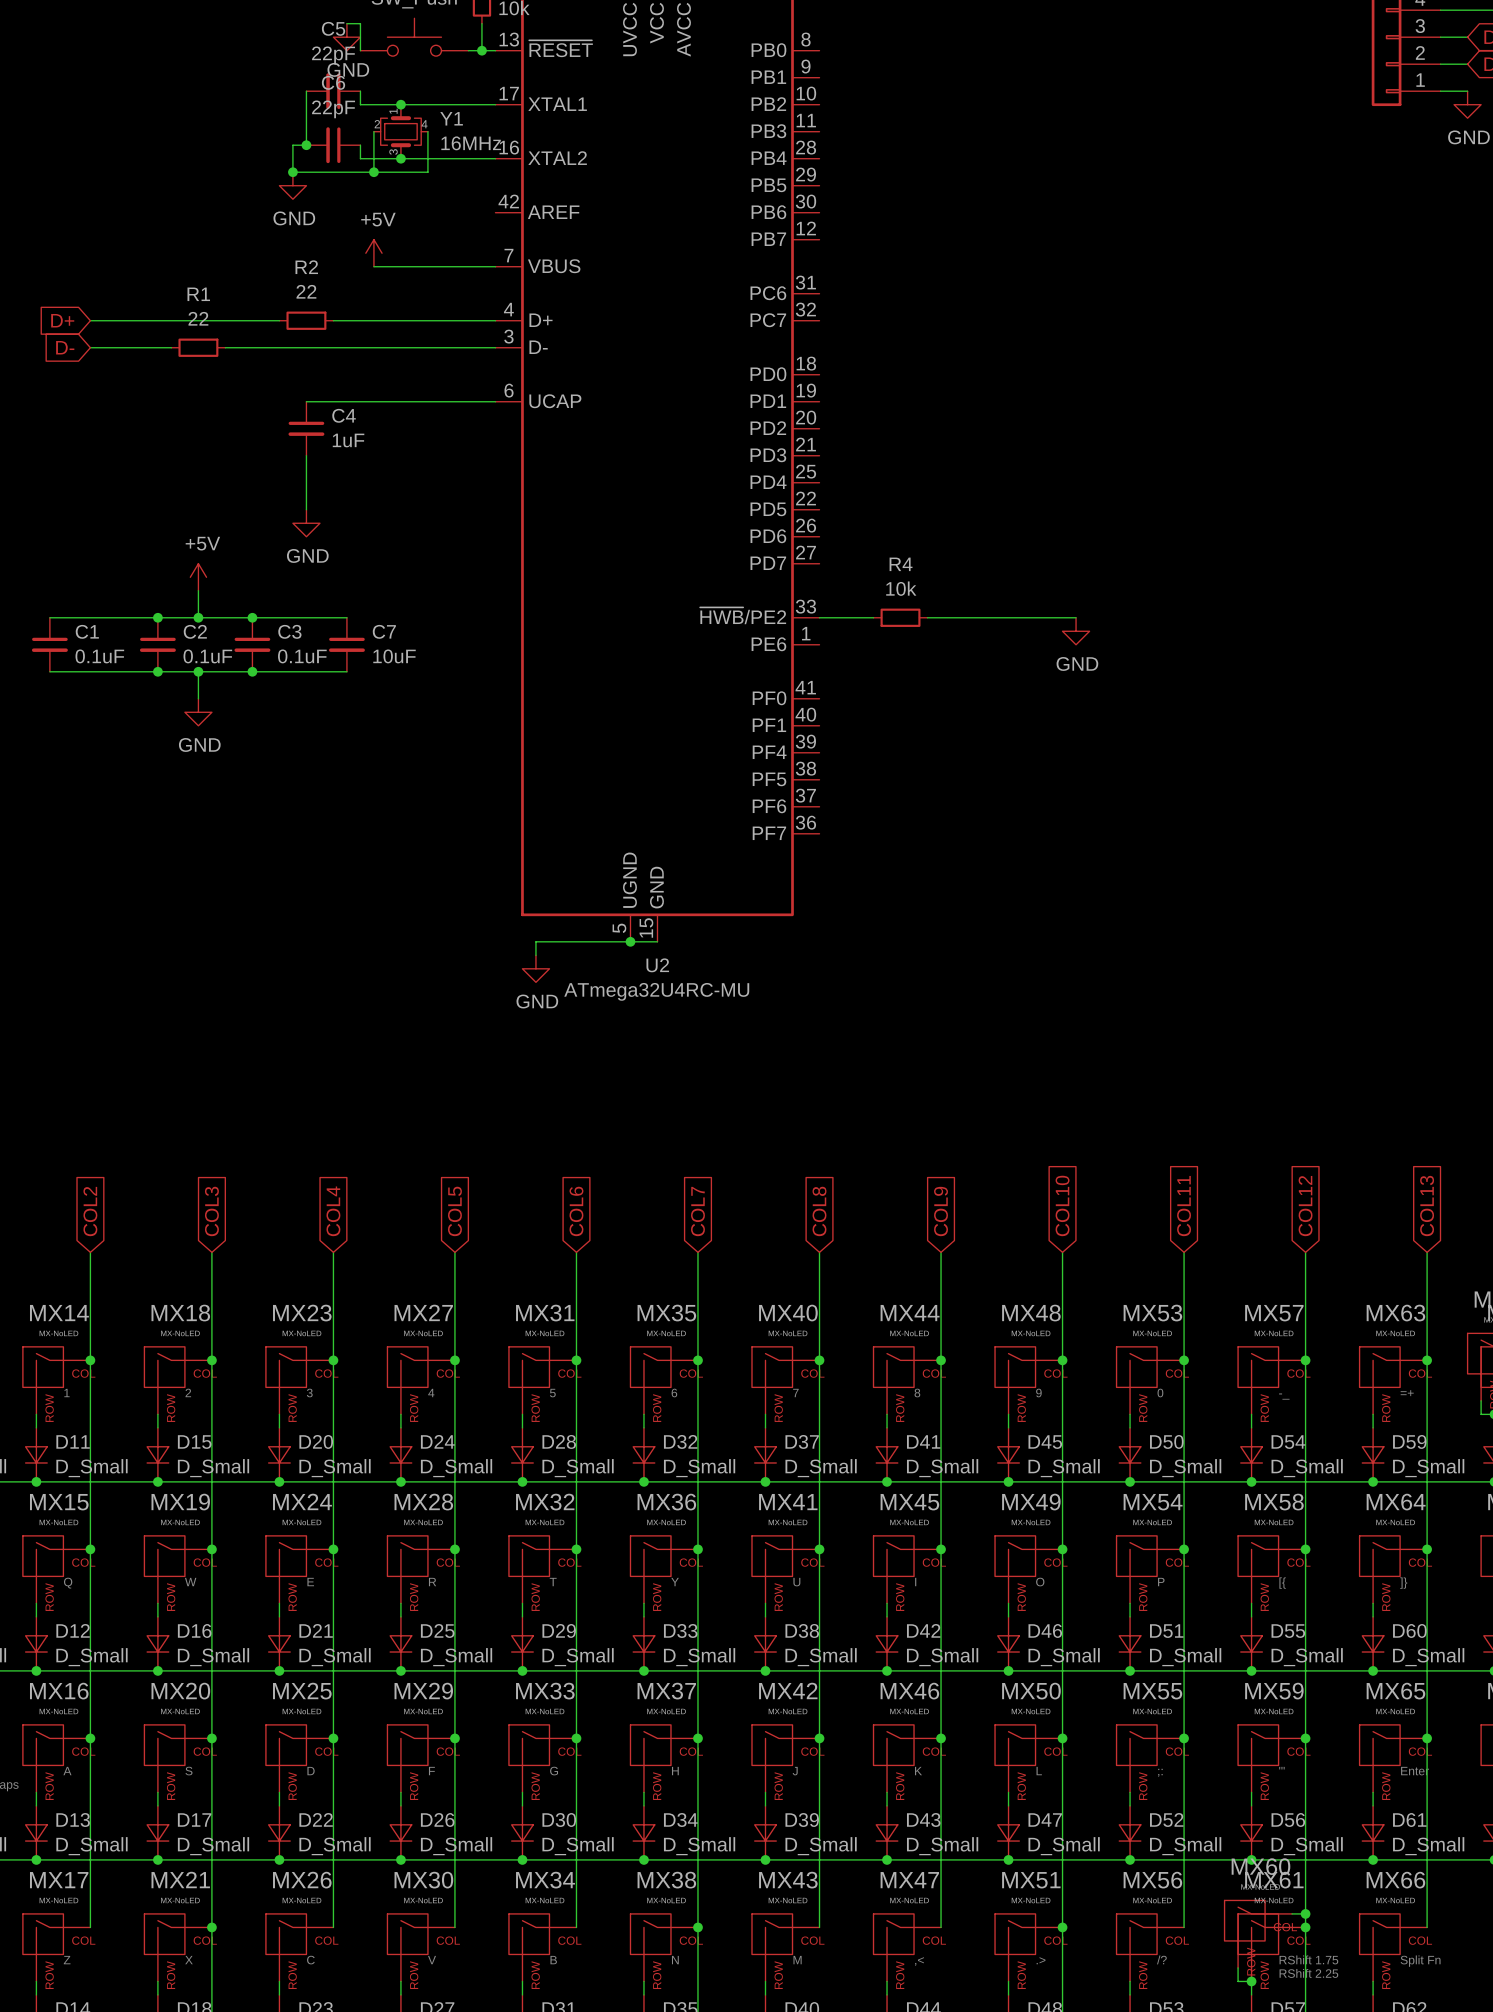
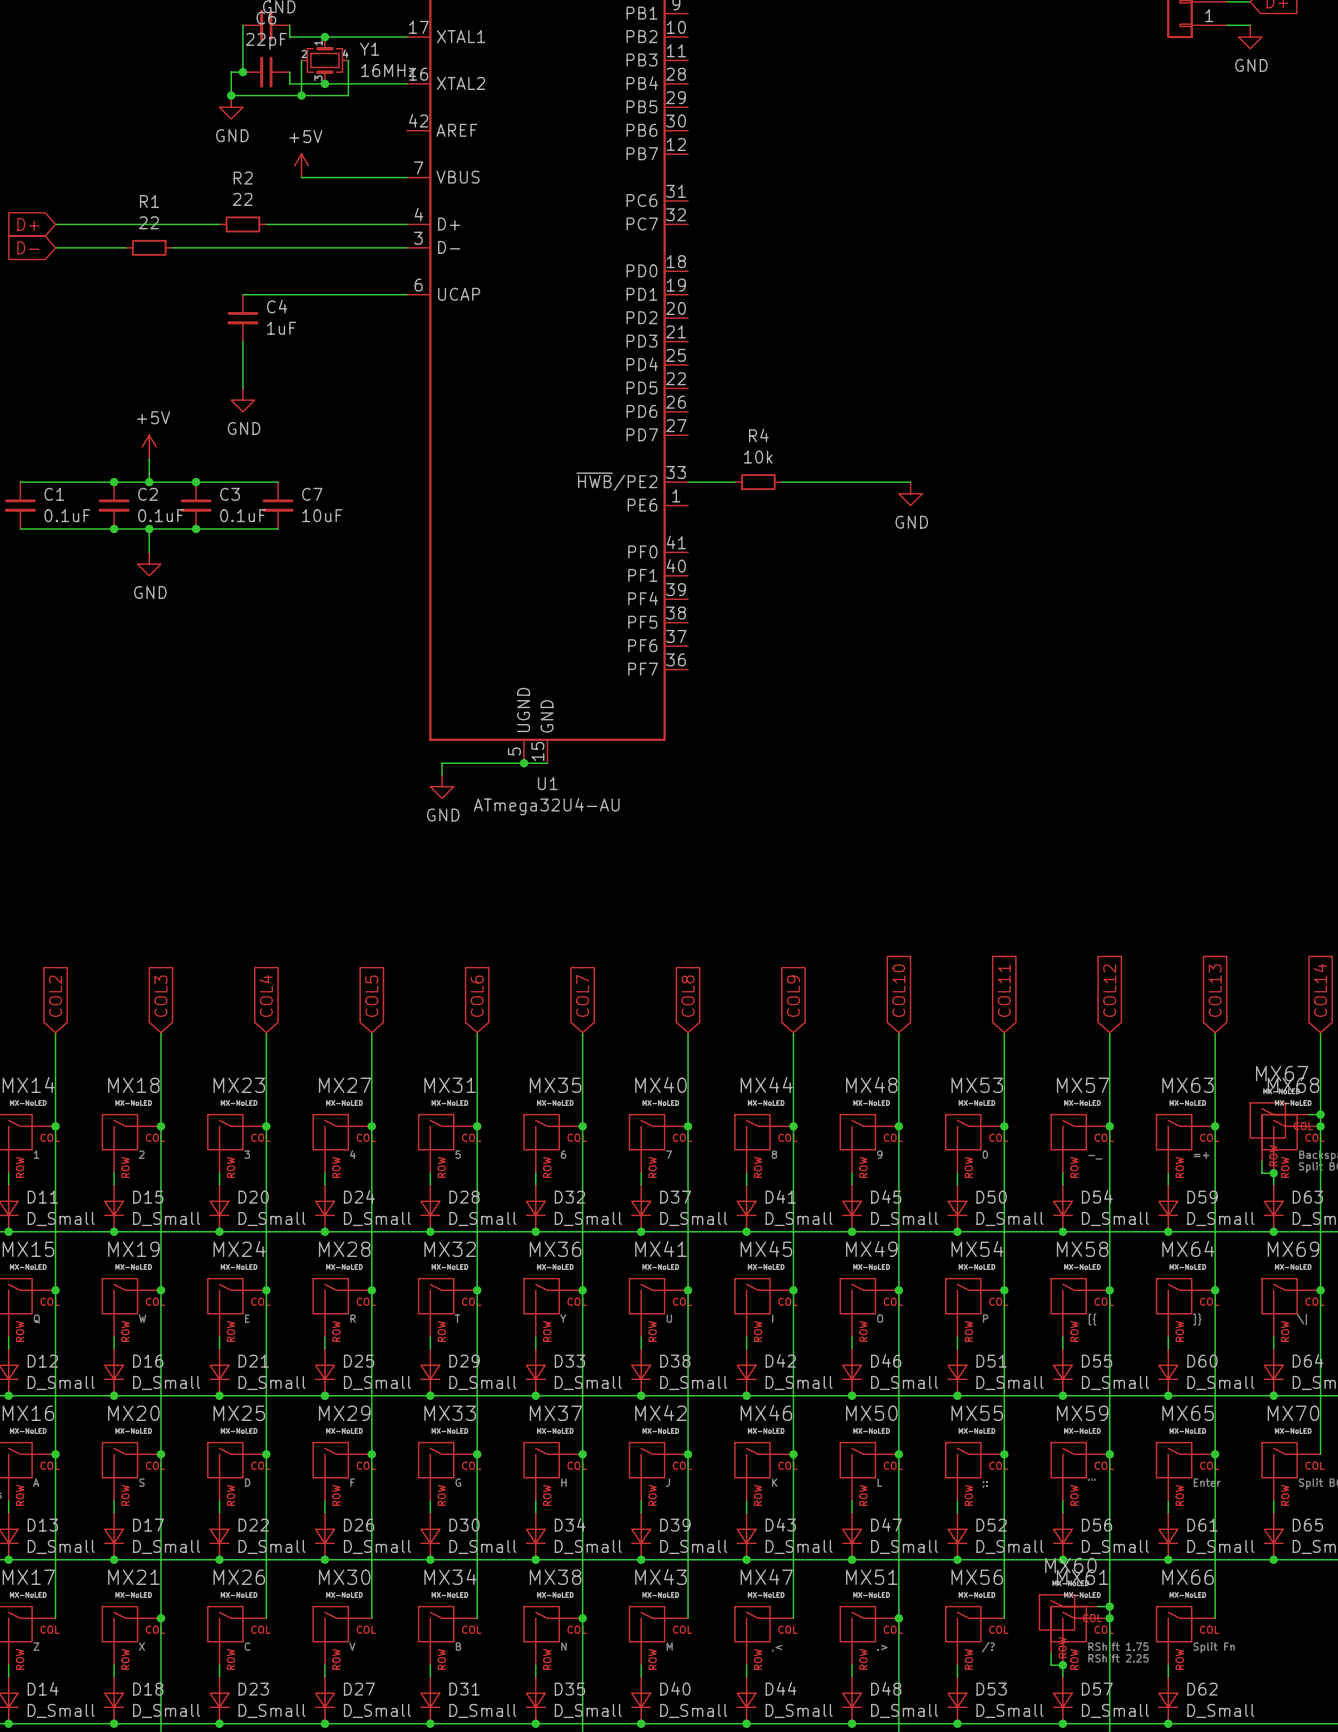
U2 name: U2 (657, 965) -> U1 (547, 783)
U2 value: ATmega32U4RC-MU (656, 991) -> ATmega32U4-AU (546, 806)

